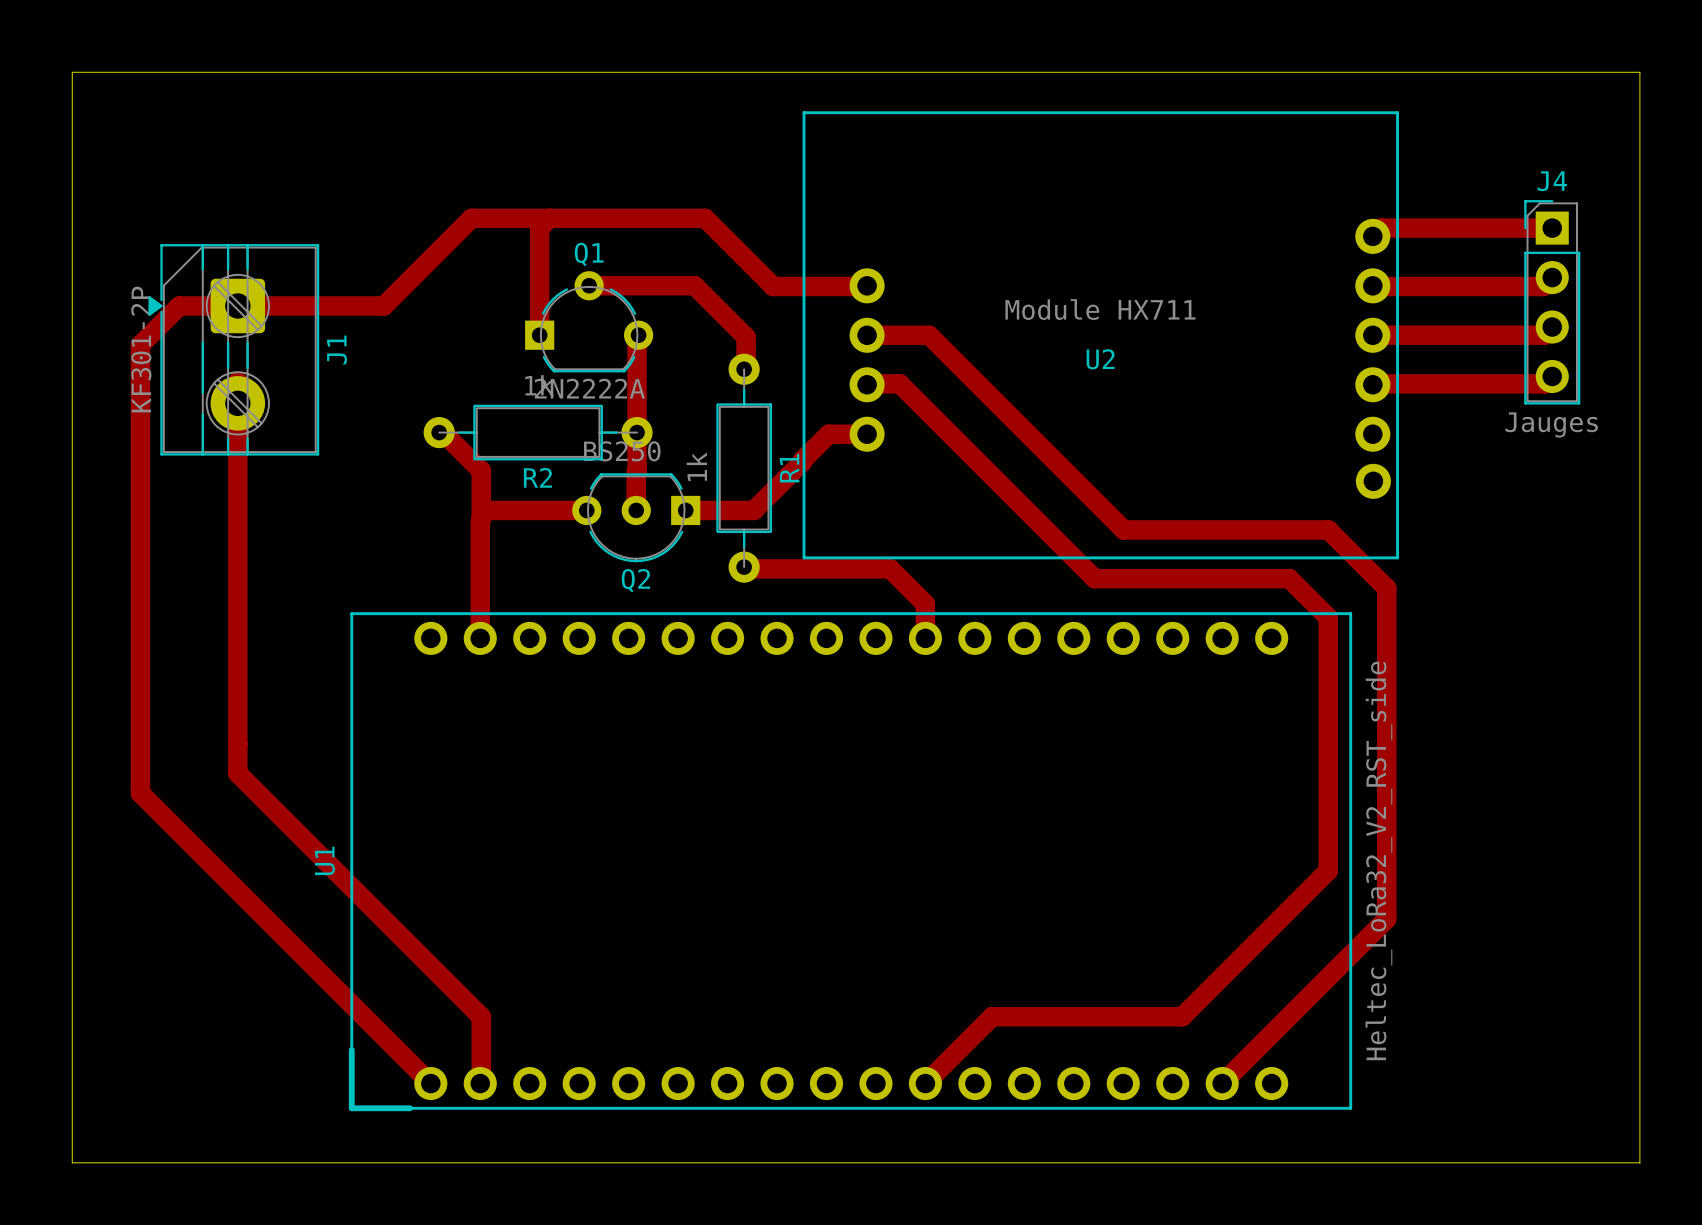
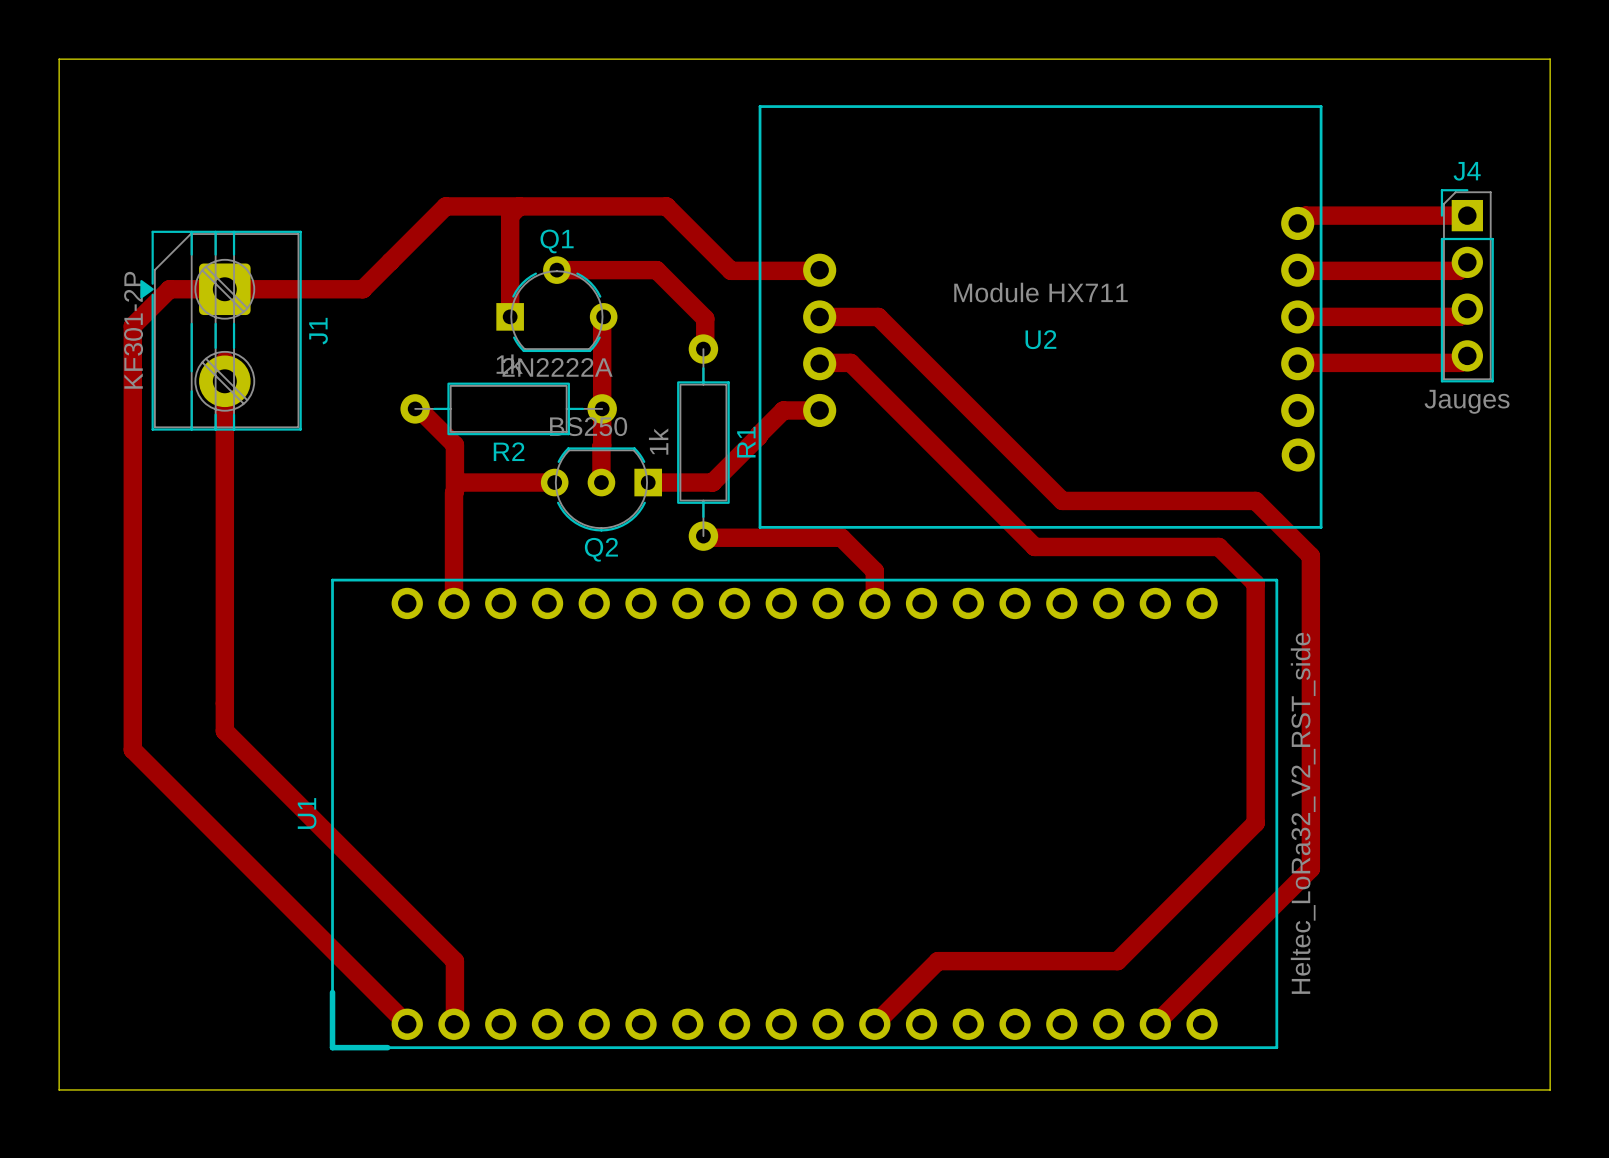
board edge: (1639, 72) (72, 72) (72, 1162) (1639, 1162) (1639, 1153) -> (1550, 68) (1550, 59) (59, 59) (59, 1089) (1550, 1089)

